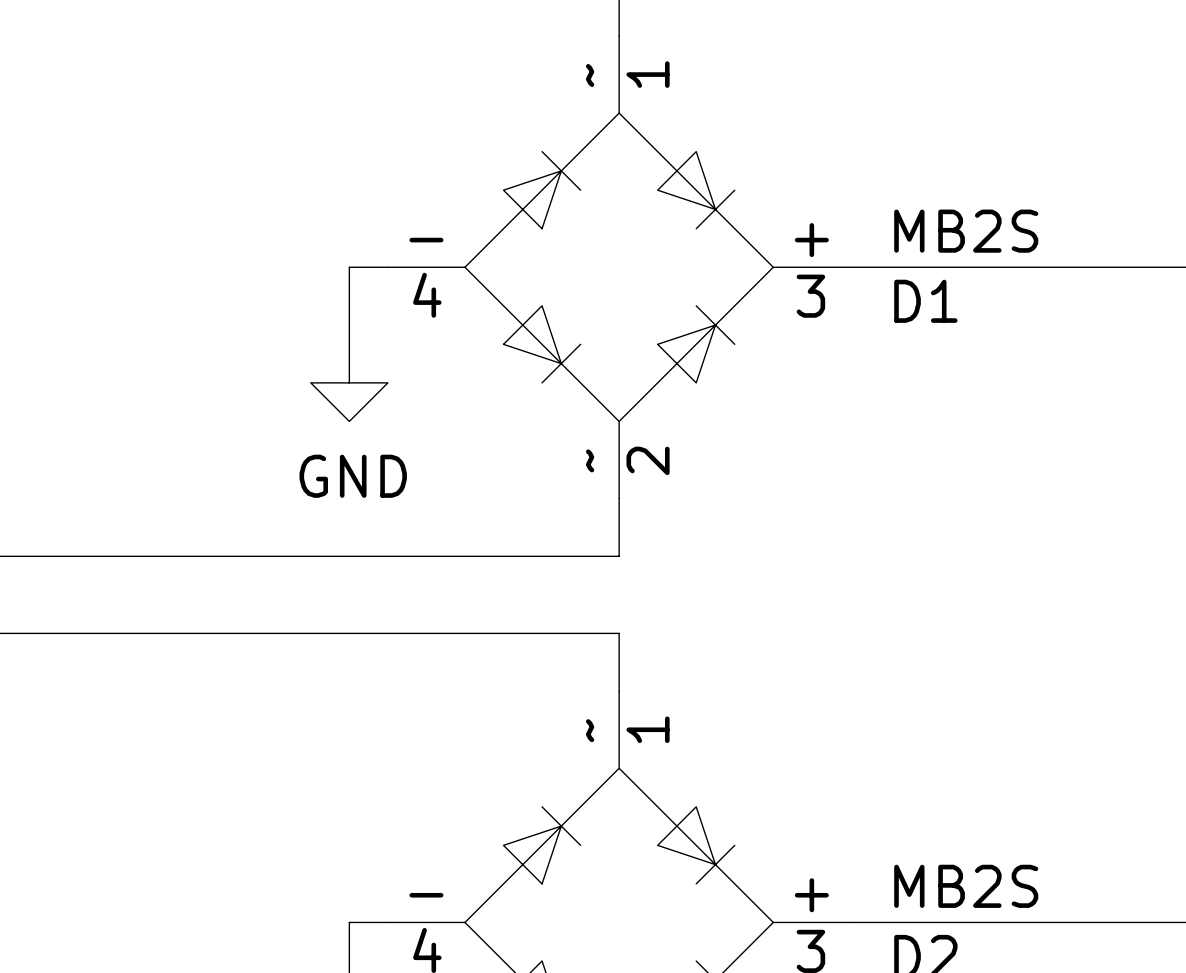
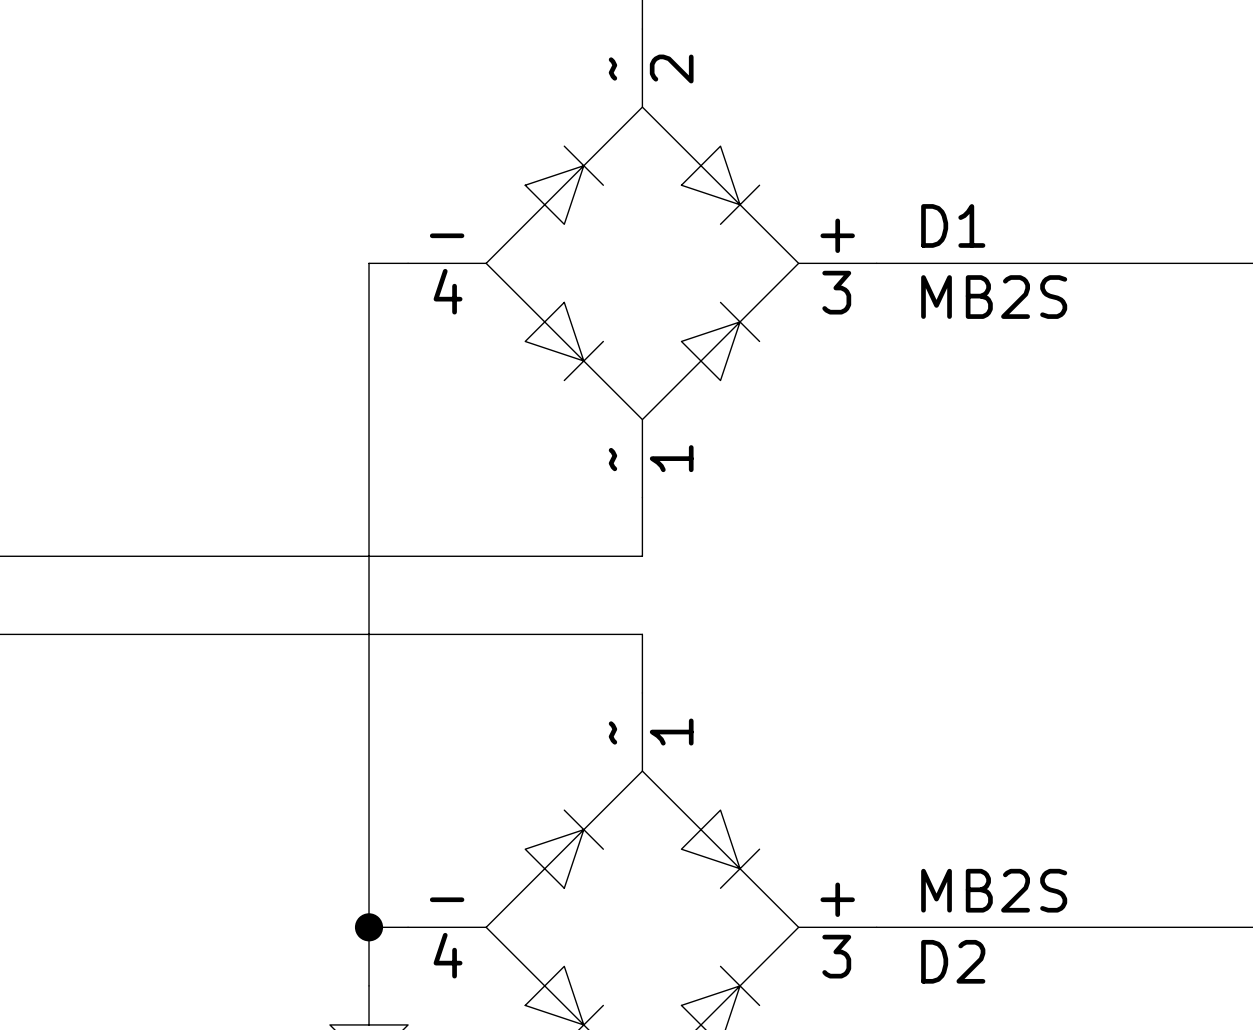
D1 flip: as is (619, 267) -> up-down (642, 263)
wire: none -> (369, 341) (369, 927)
power symbol: GND (349, 382) -> none
junction: none -> (369, 927)

